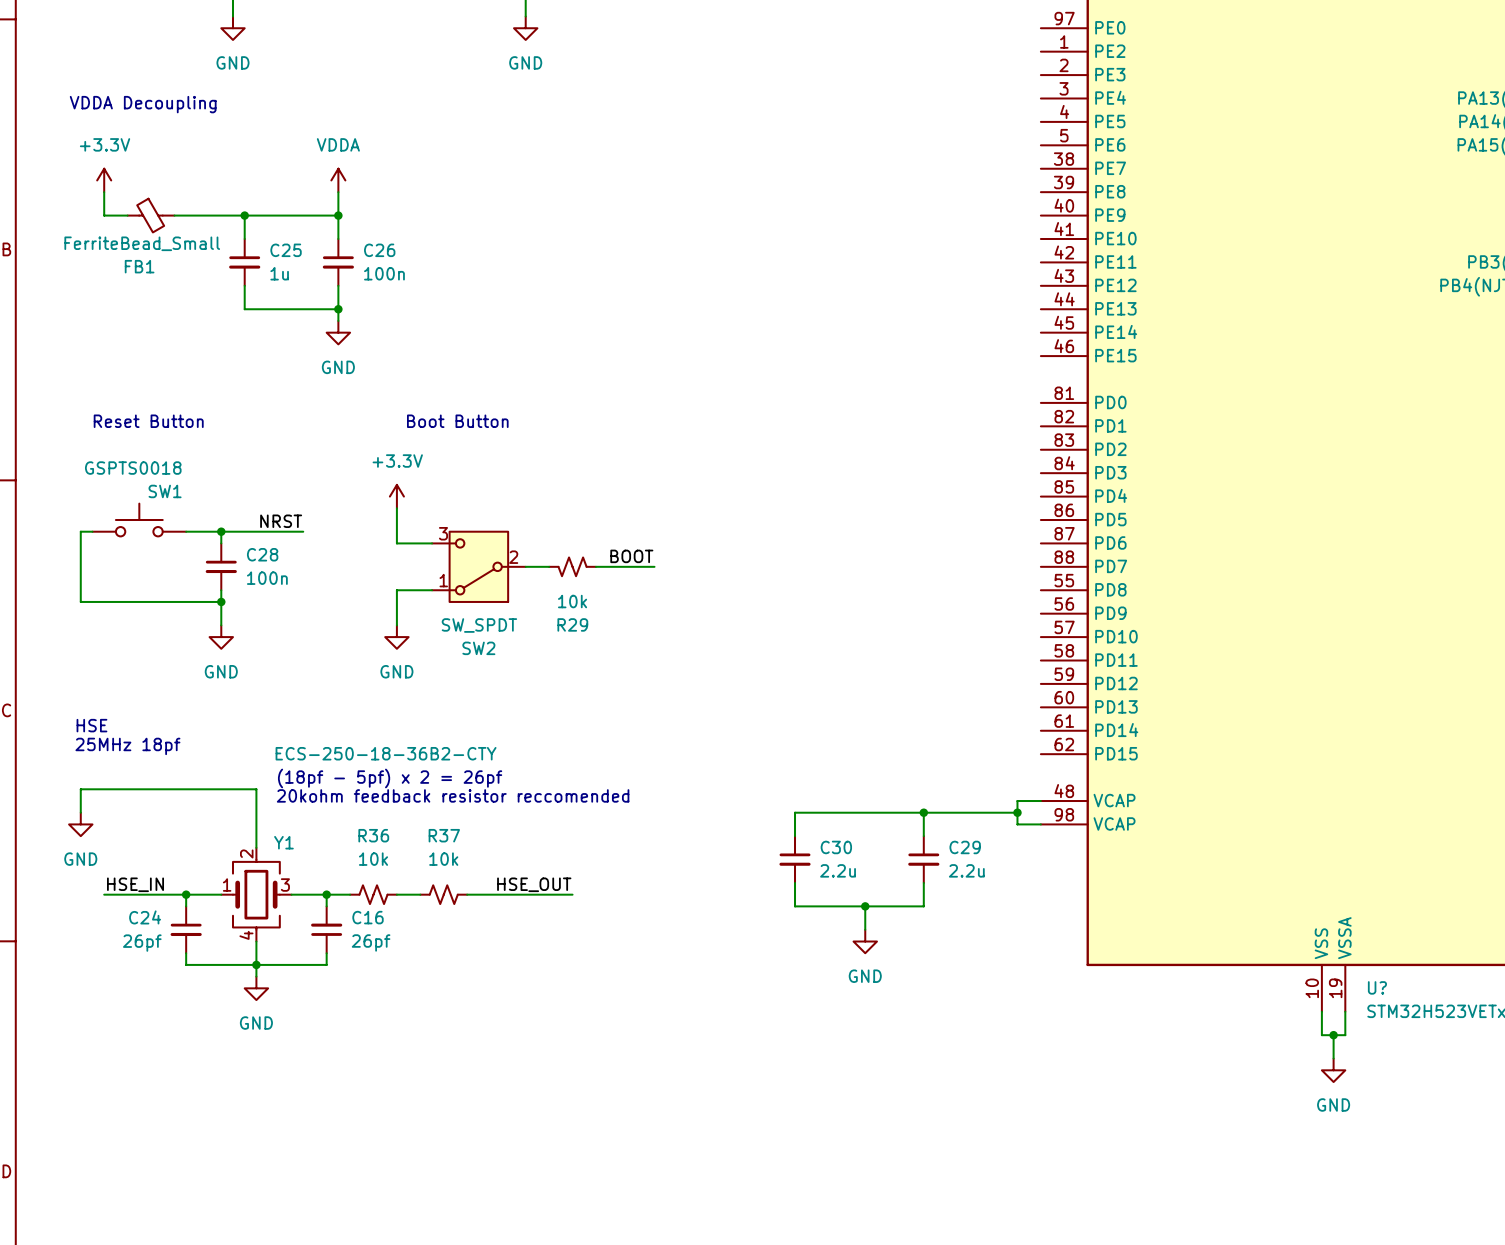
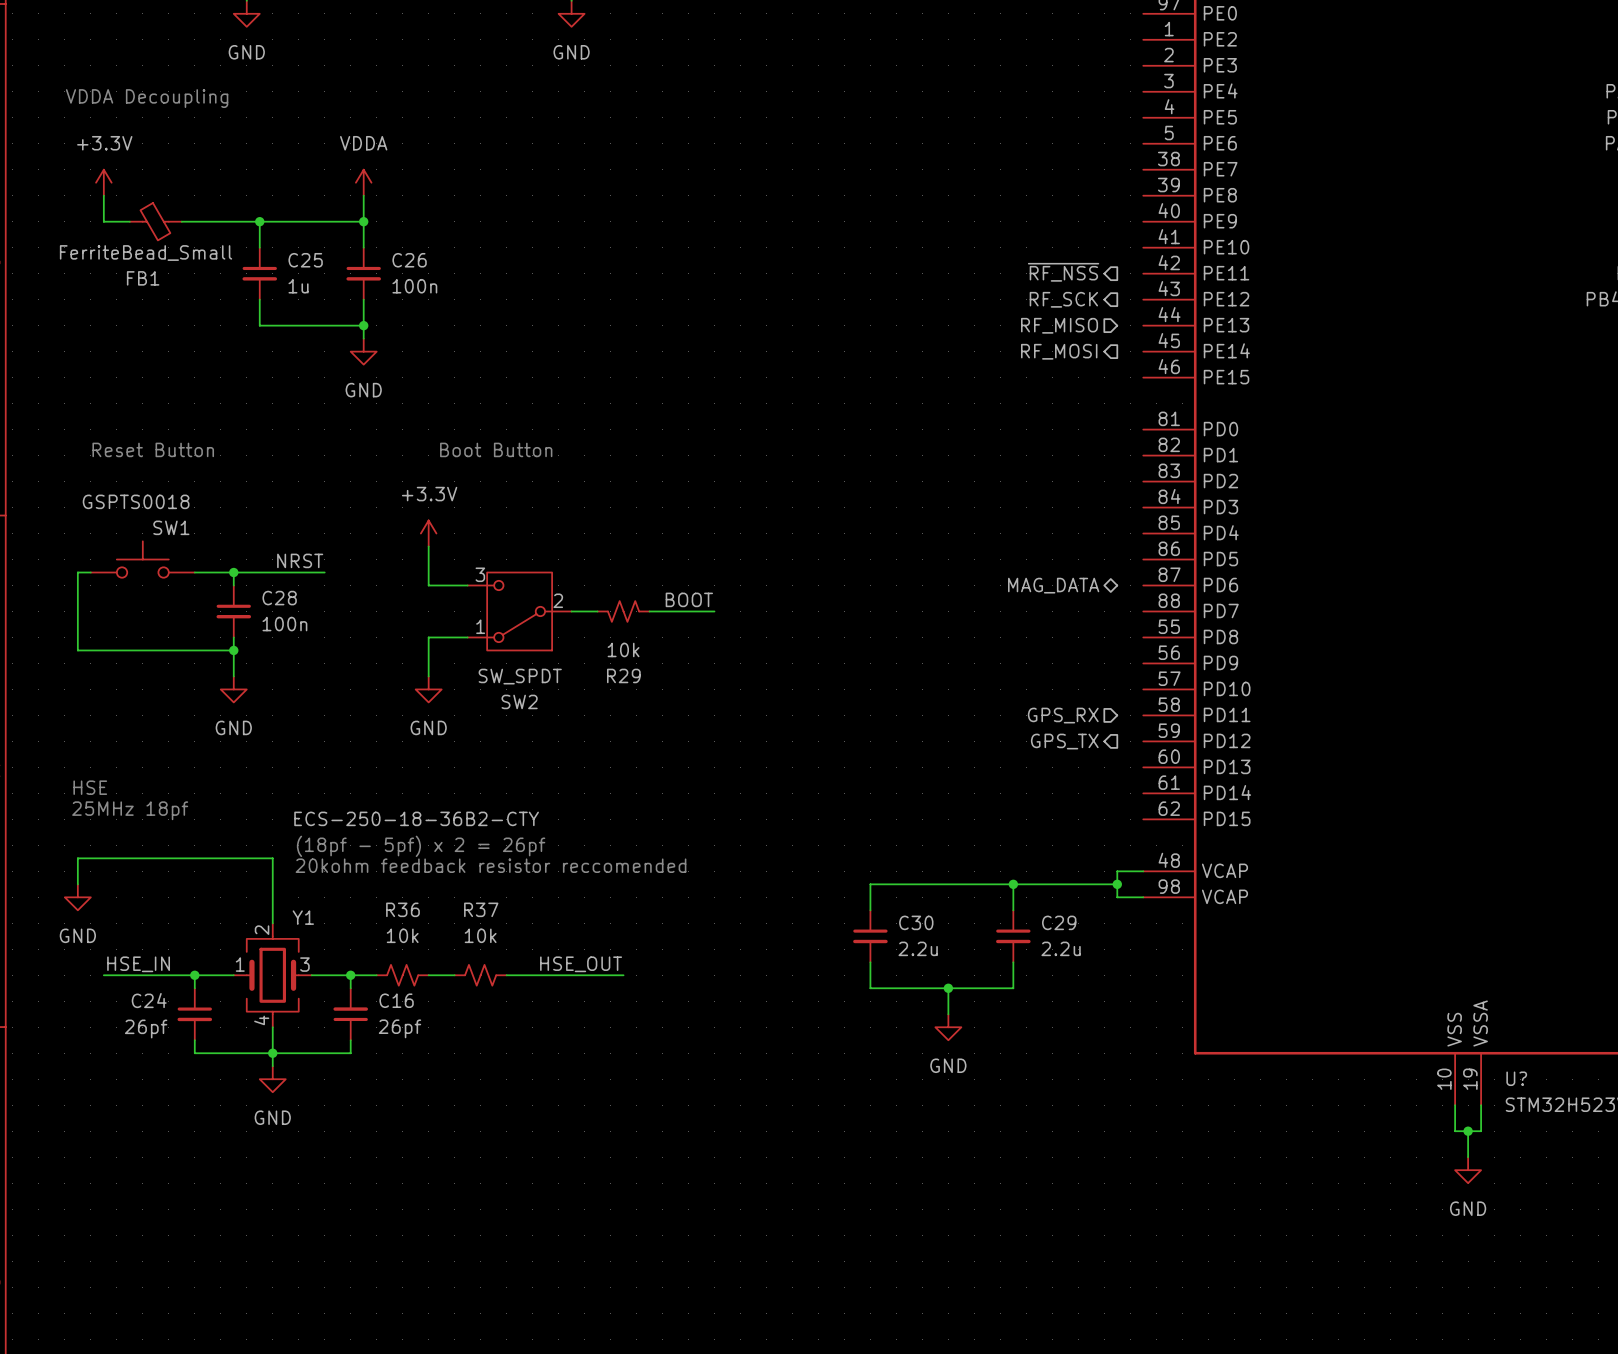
hierarchical label: none -> ~{RF_NSS} (1063, 272)
hierarchical label: none -> RF_SCK (1063, 299)
hierarchical label: none -> RF_MISO (1059, 325)
hierarchical label: none -> RF_MOSI (1059, 351)
hierarchical label: none -> MAG_DATA (1053, 585)
hierarchical label: none -> GPS_RX (1063, 715)
hierarchical label: none -> GPS_TX (1064, 741)

